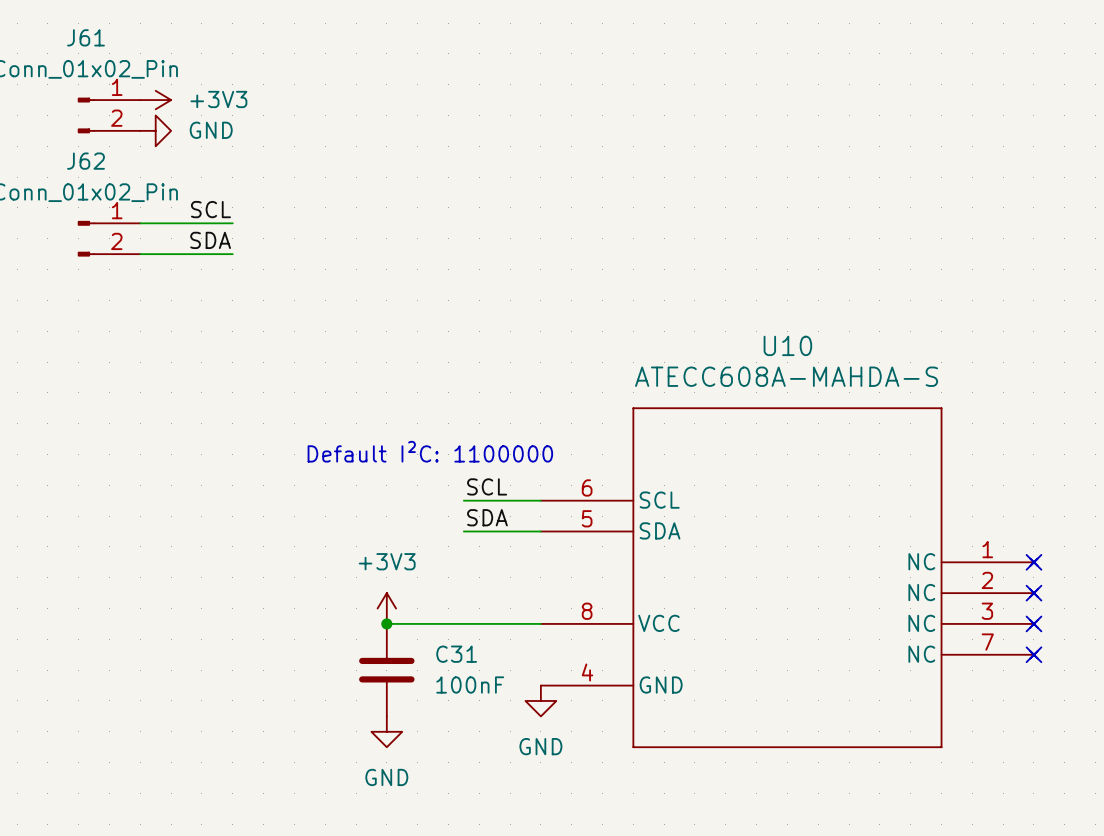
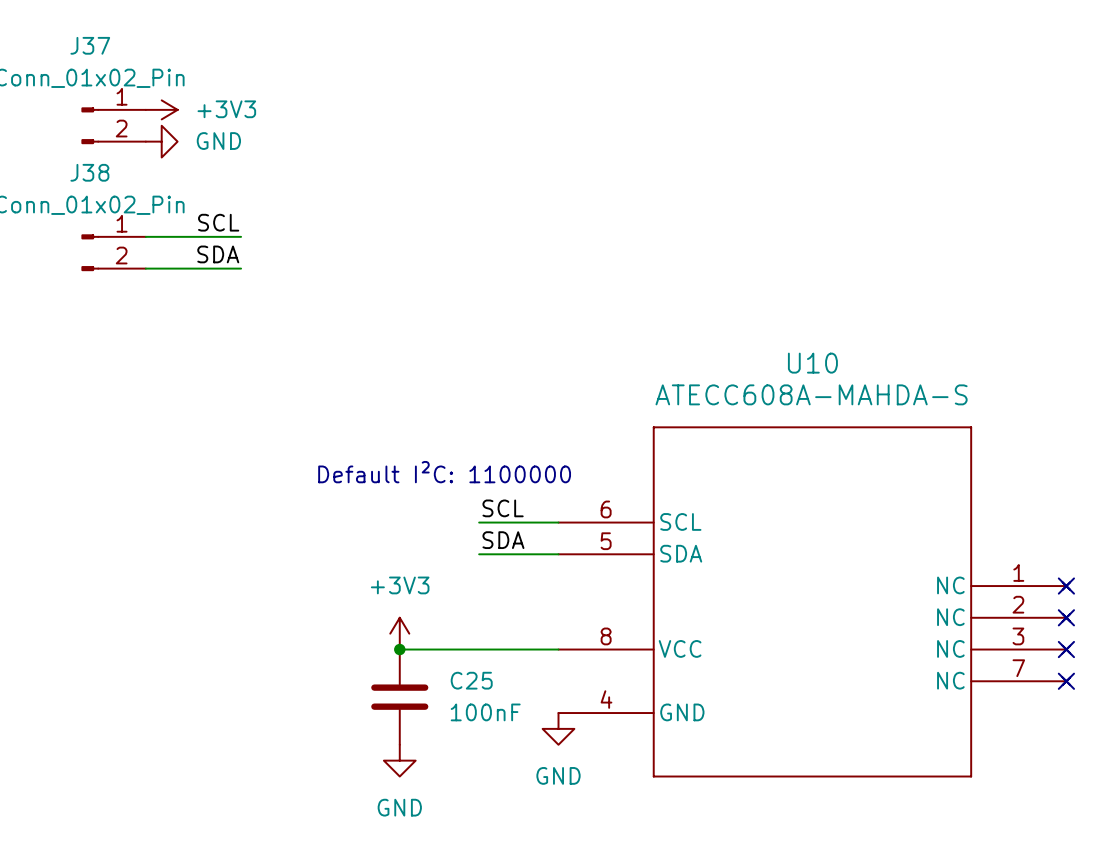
J61 name: J61 (85, 37) -> J37 (90, 45)
J62 name: J62 (85, 161) -> J38 (89, 172)
C31 name: C31 (456, 654) -> C25 (471, 680)

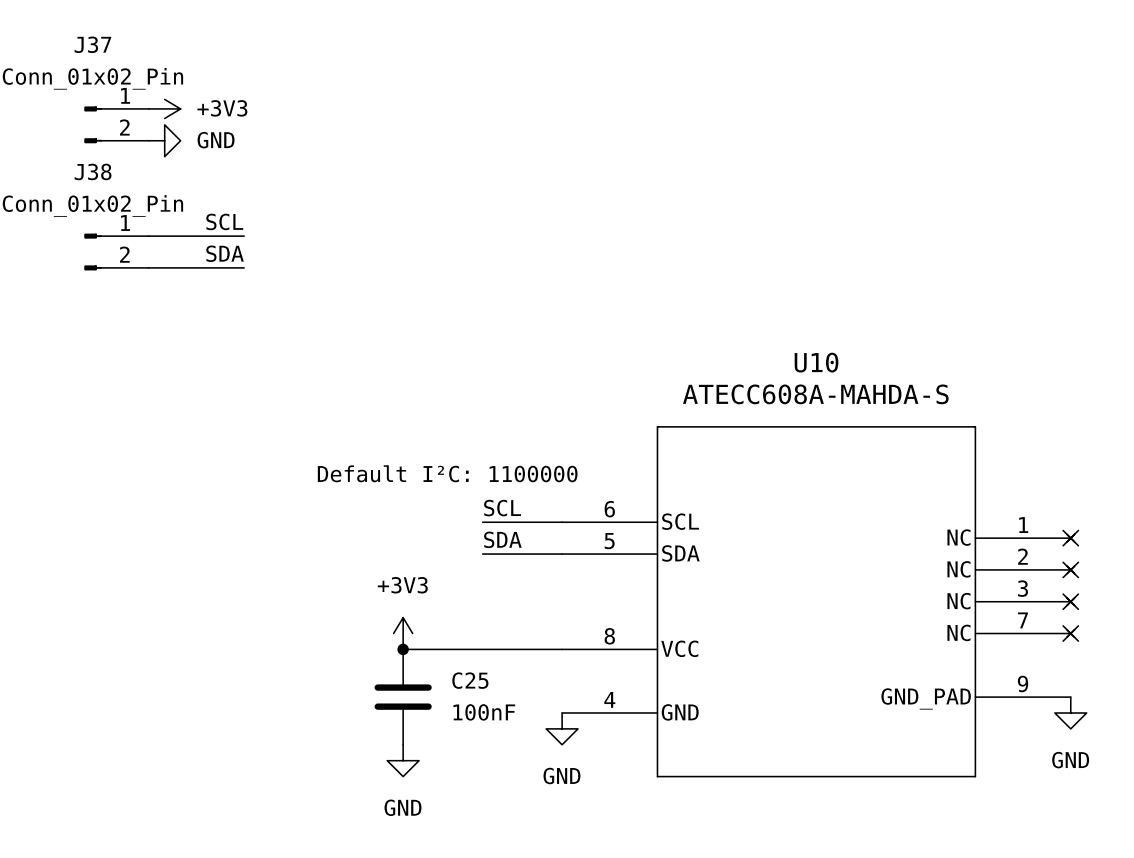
U10 symbol: [558, 426, 1071, 778] -> [562, 426, 1075, 778]
no-connect mark: none -> (1070, 538)
no-connect mark: none -> (1070, 569)
no-connect mark: (1066, 586) -> none
no-connect mark: none -> (1070, 601)
no-connect mark: (1066, 617) -> none
no-connect mark: none -> (1070, 633)
no-connect mark: (1066, 649) -> none
no-connect mark: (1066, 681) -> none
power symbol: none -> GND (1070, 713)

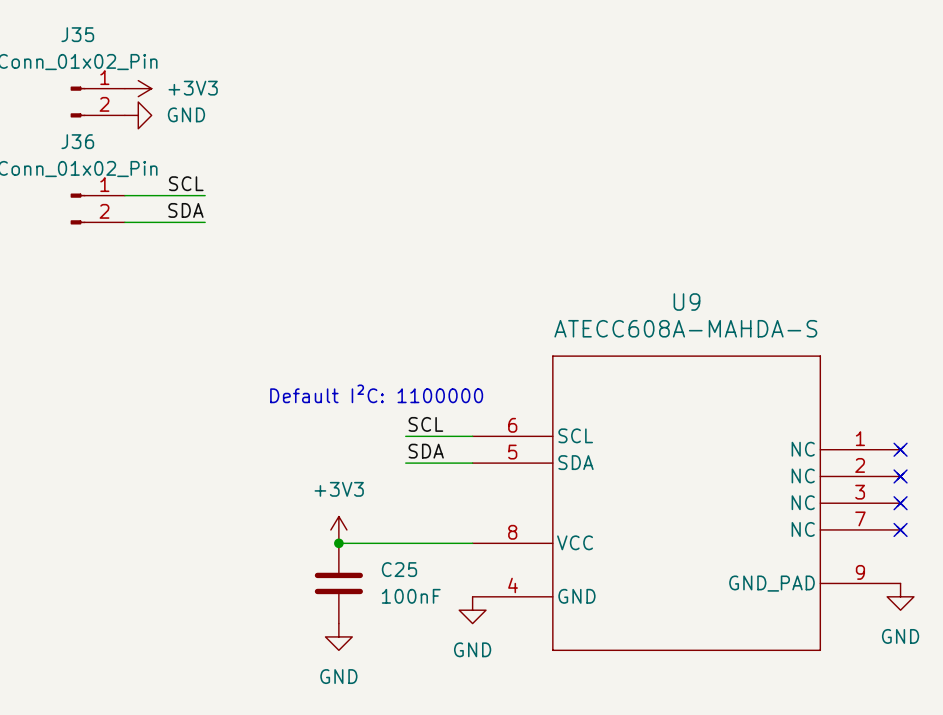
J37 name: J37 (92, 44) -> J35 (77, 34)
J38 name: J38 (93, 171) -> J36 (77, 141)
U10 name: U10 (816, 362) -> U9 (686, 302)

